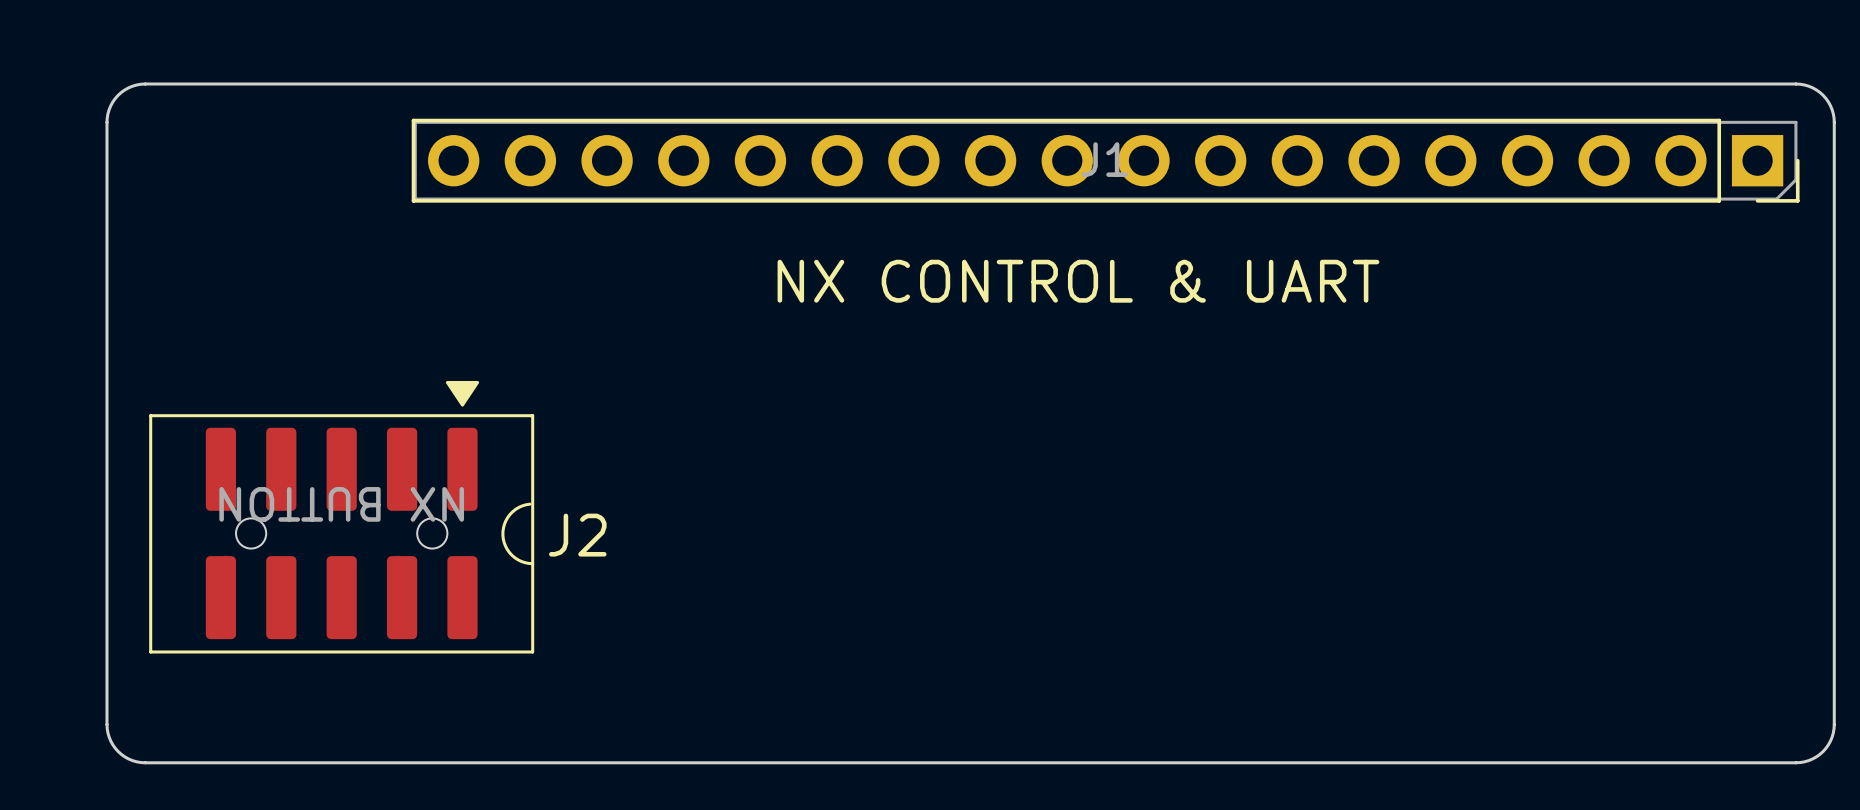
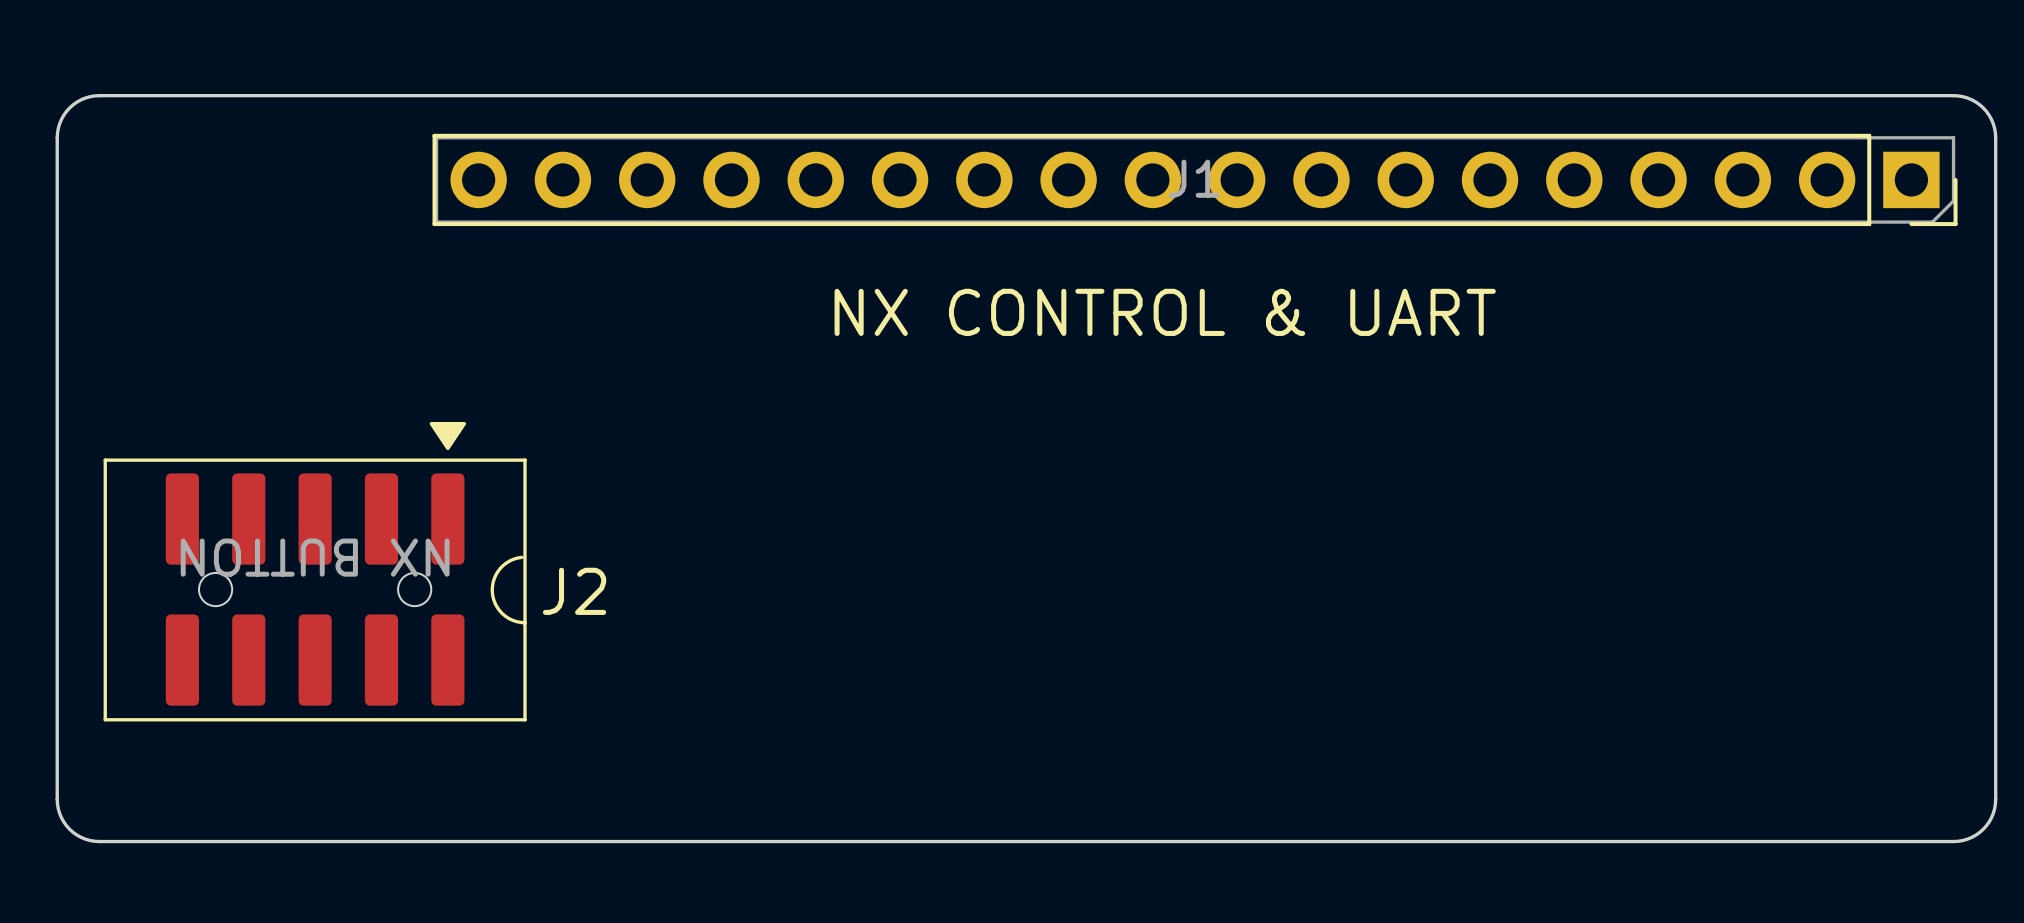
board edge: (145, 84) (132, 86) (118, 95) (109, 109) (106, 122) (107, 728) (112, 744) (121, 754) (132, 760) (145, 762) -> (139, 95) (94, 95) (81, 99) (69, 108) (63, 115) (59, 123) (57, 137) (57, 804) (63, 821) (69, 829) (81, 837) (94, 841) (139, 841)
J2 position: (341, 517) -> (315, 571)

